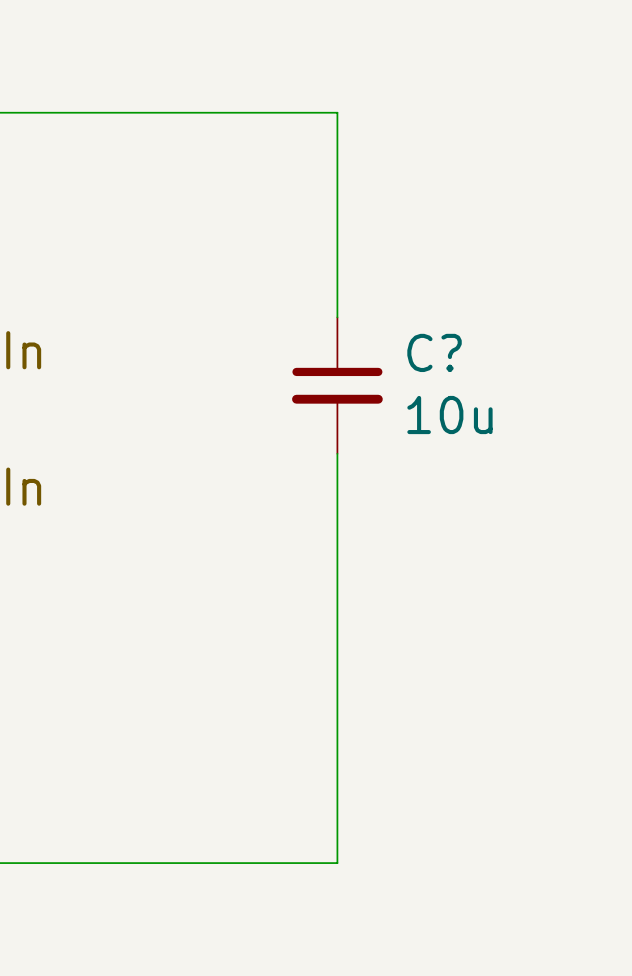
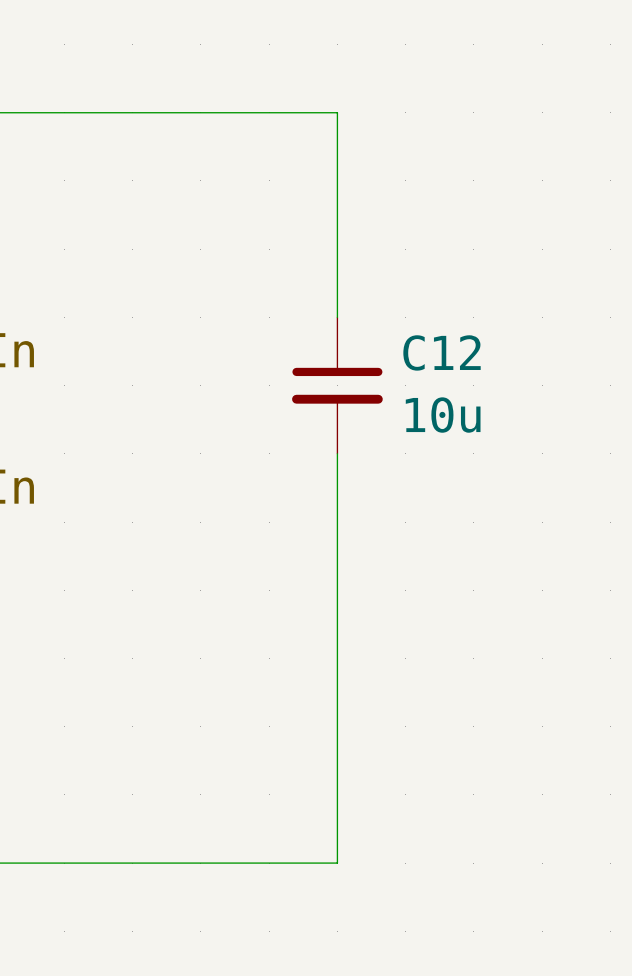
C? name: C? (434, 352) -> C12 (442, 352)

